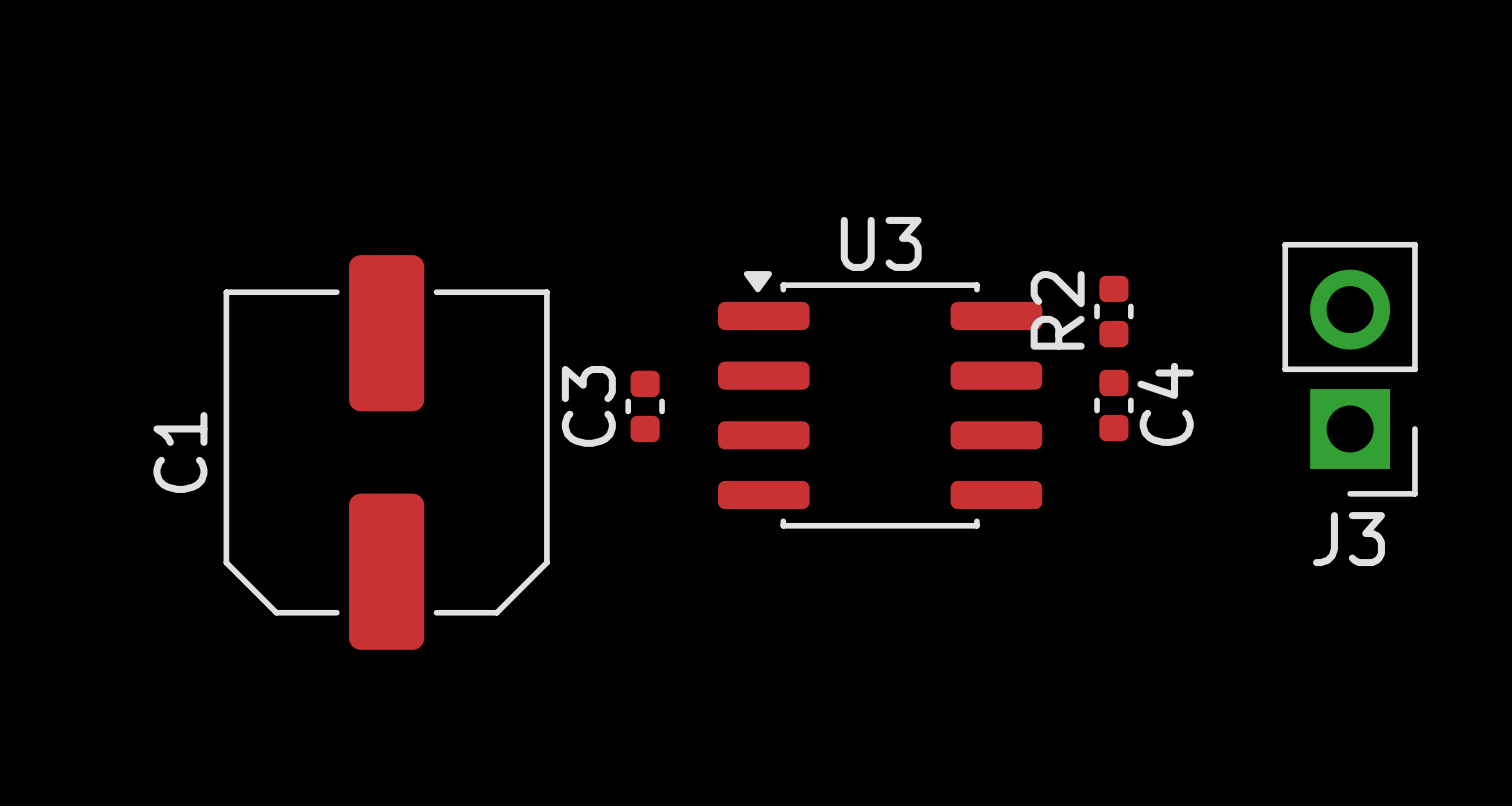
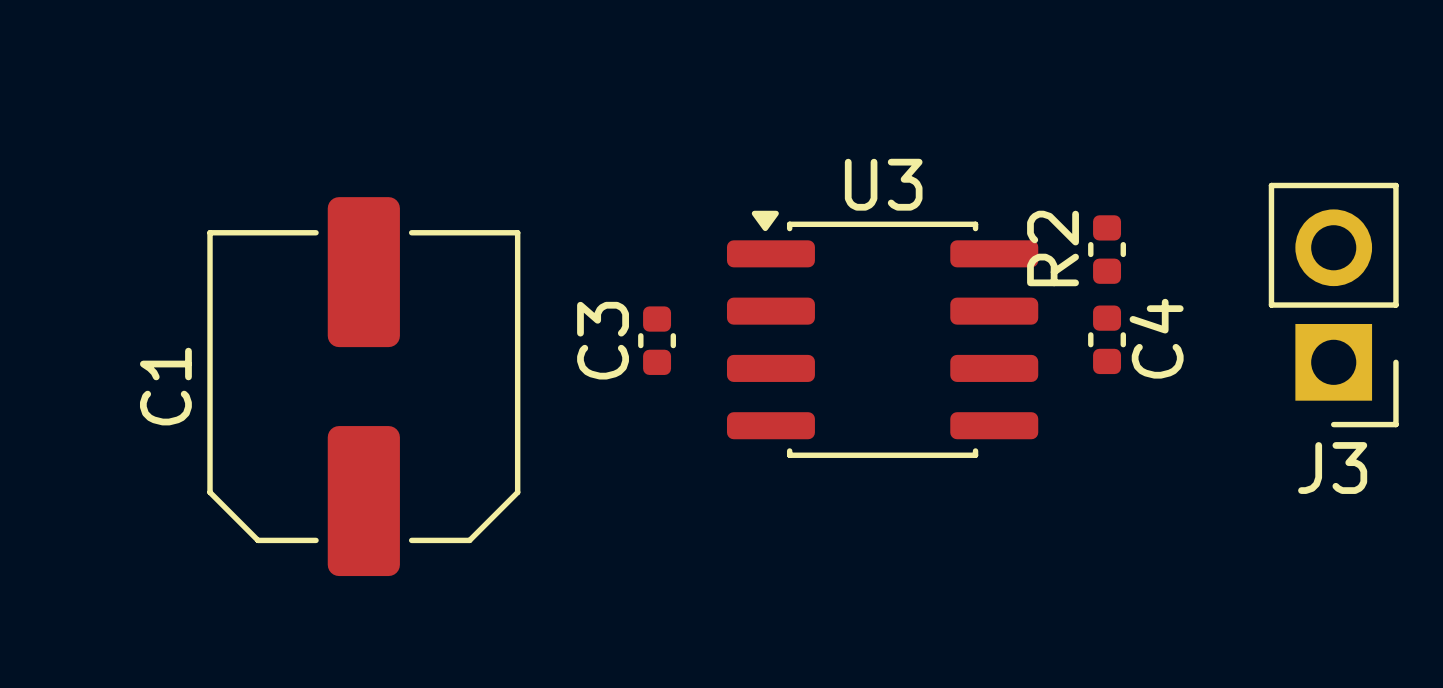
C1 position: (386, 452) -> (363, 386)

